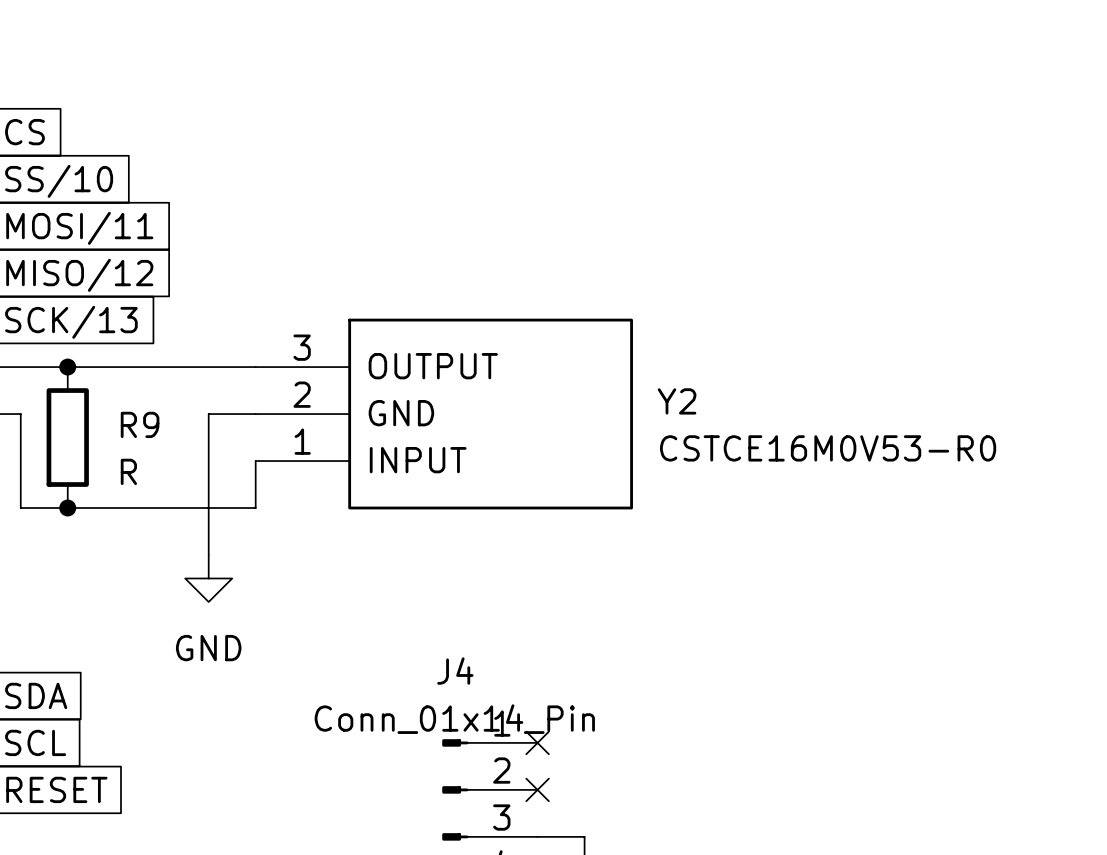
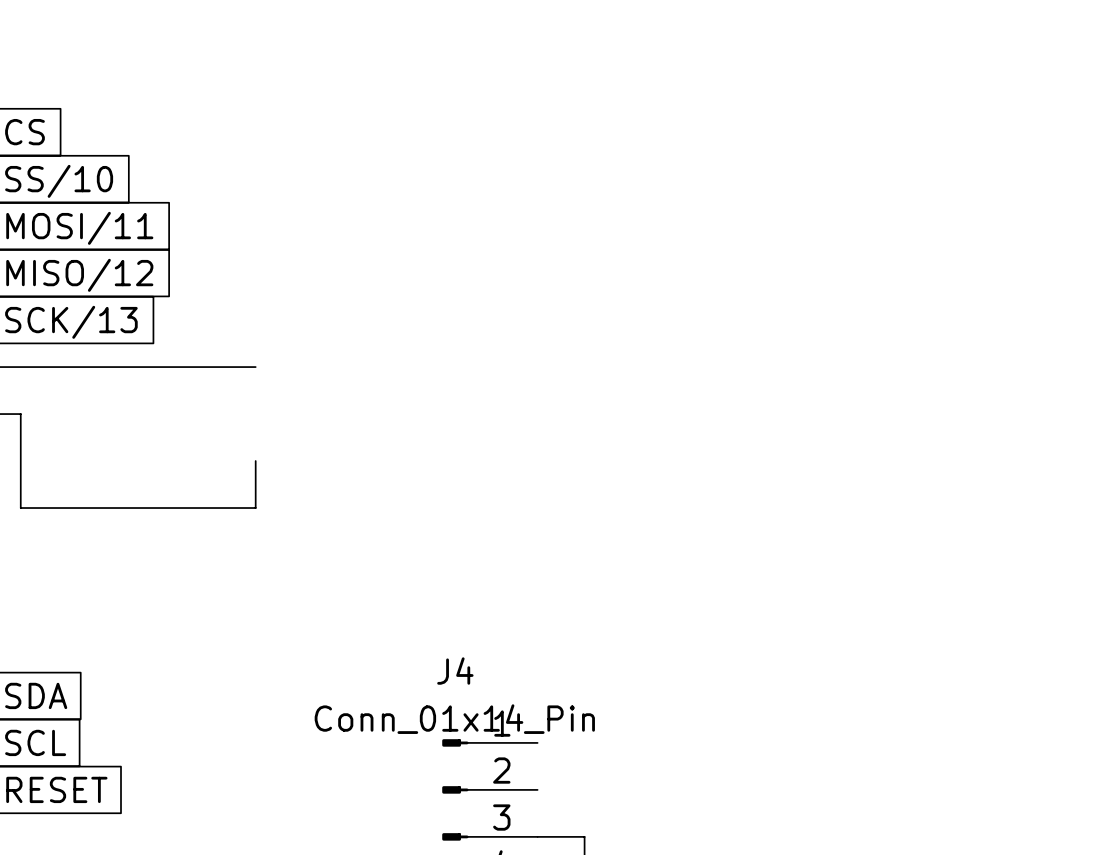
junction: (67, 367) -> none
wire: (255, 414) (208, 414) (208, 554) -> none
Y2: CSTCE16M0V53-R0 (444, 414) -> none
R9: R (67, 437) -> none
junction: (67, 508) -> none
power symbol: GND (208, 578) -> none
no-connect mark: (537, 742) -> none
no-connect mark: (537, 789) -> none

